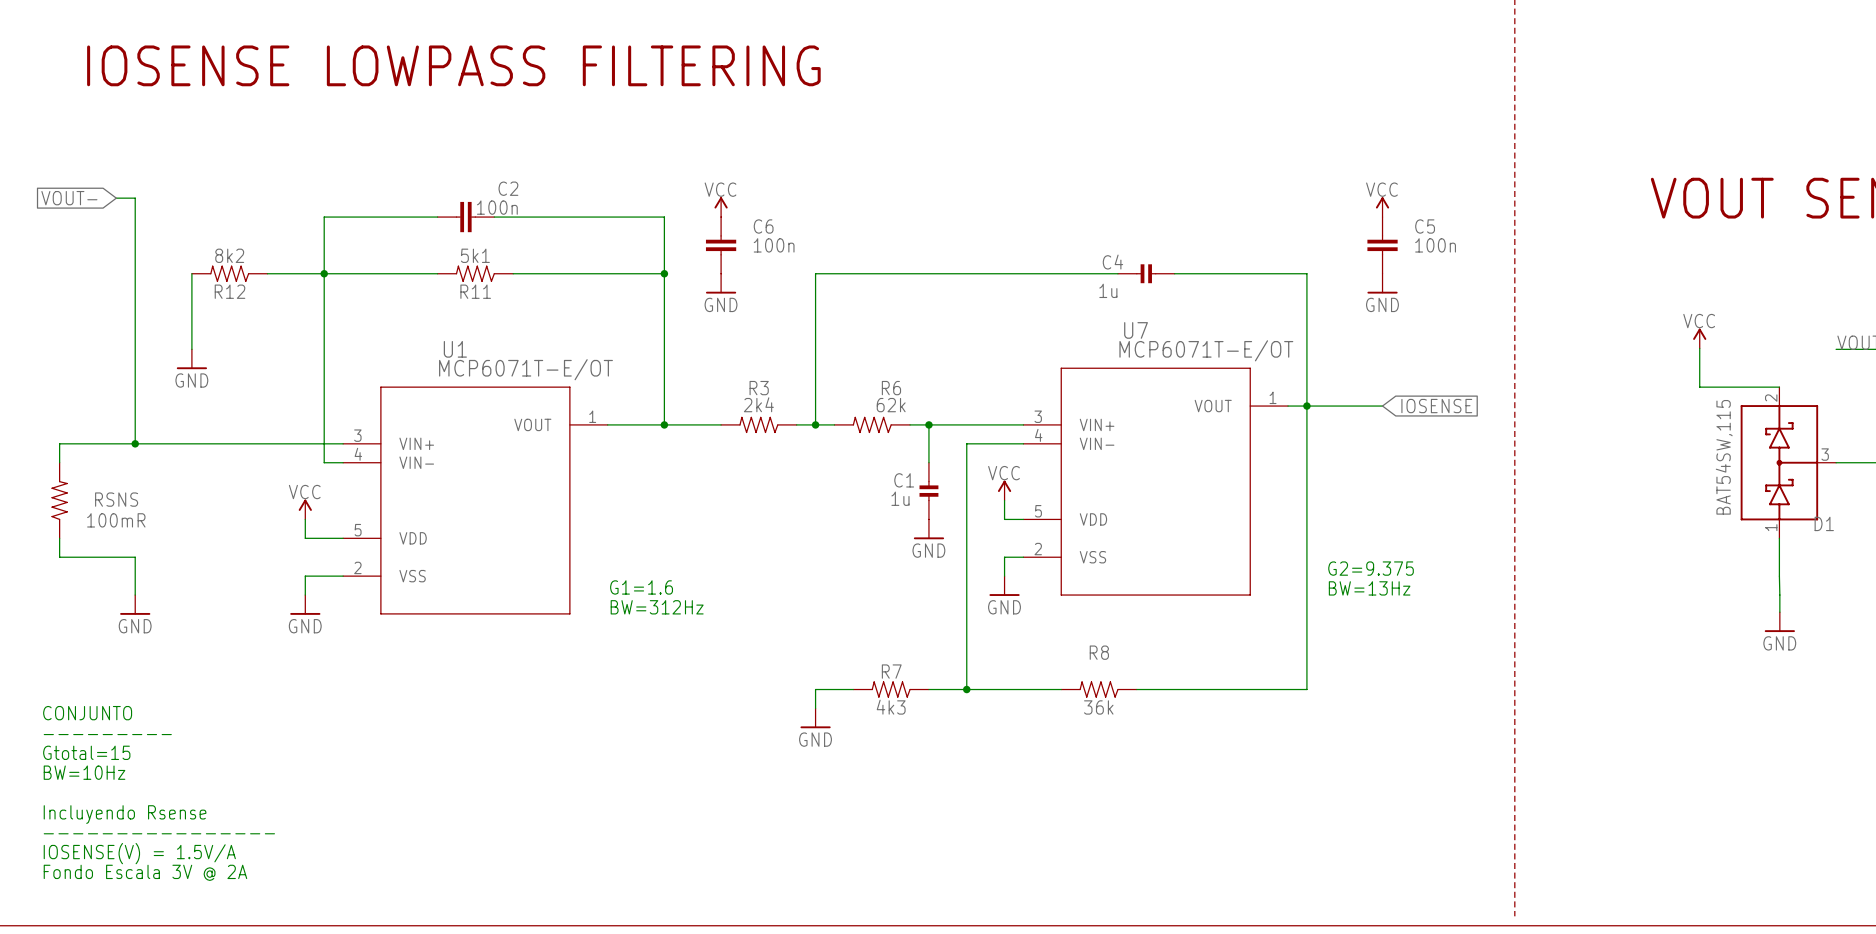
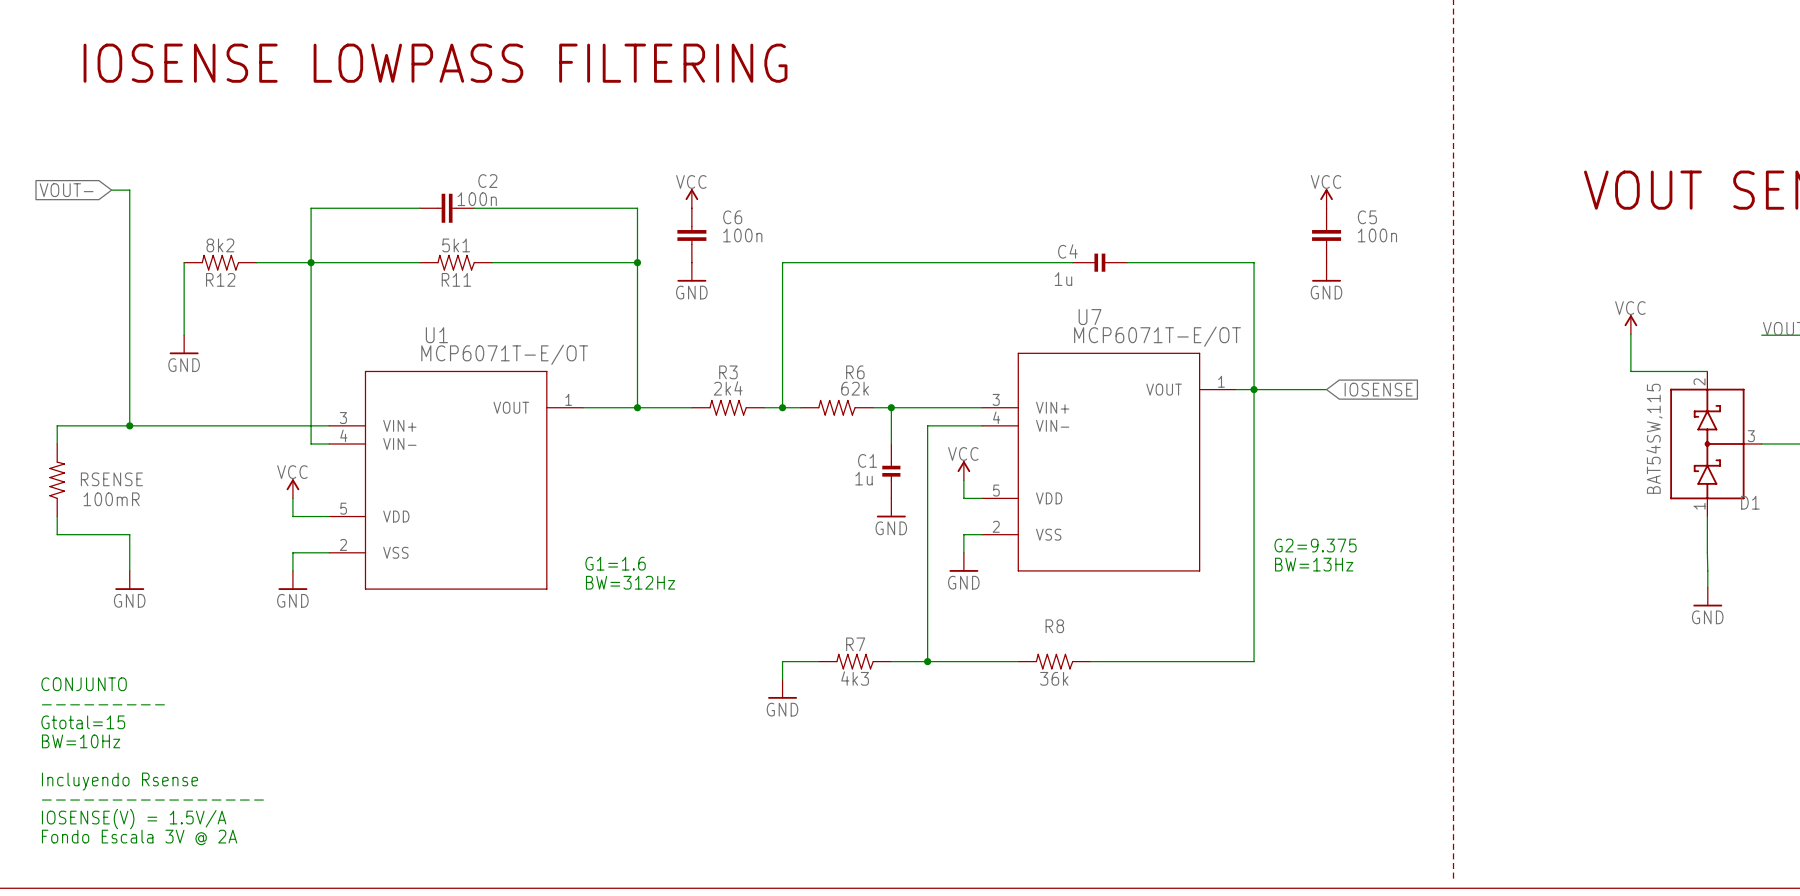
RSNS name: RSNS (116, 499) -> RSENSE (111, 479)

